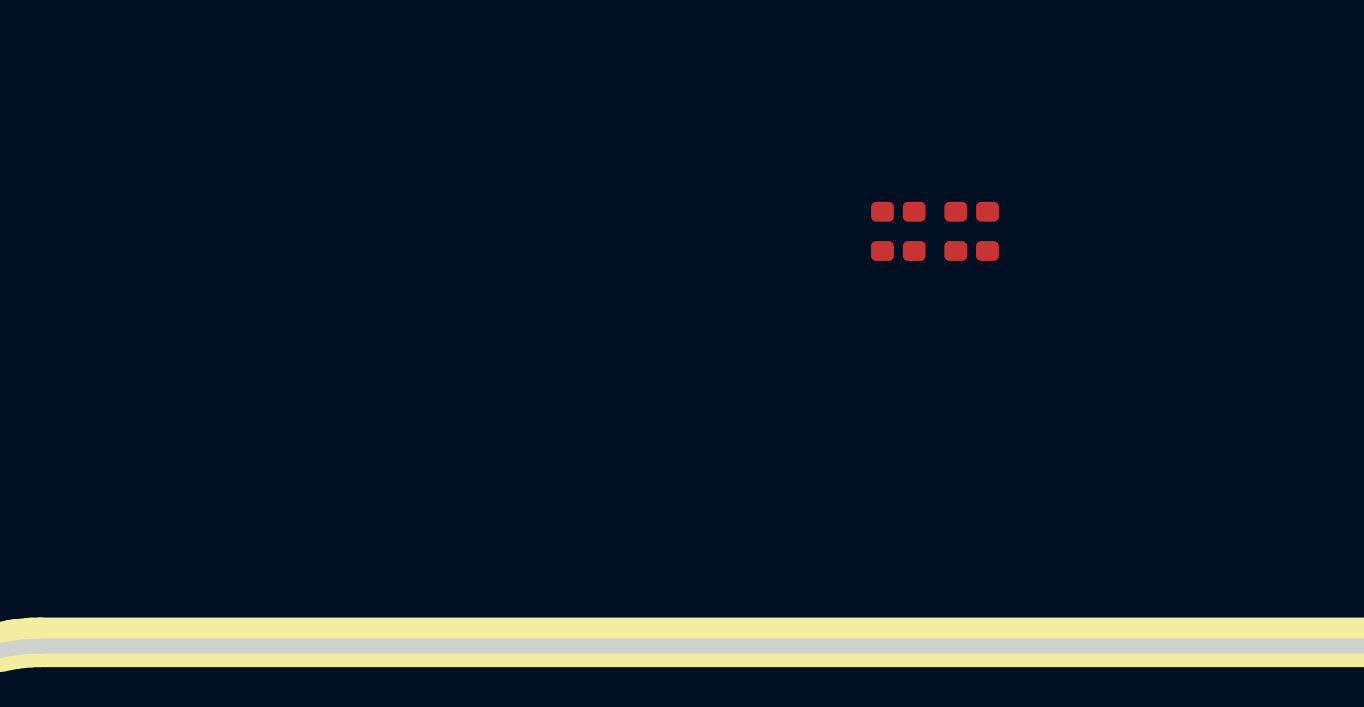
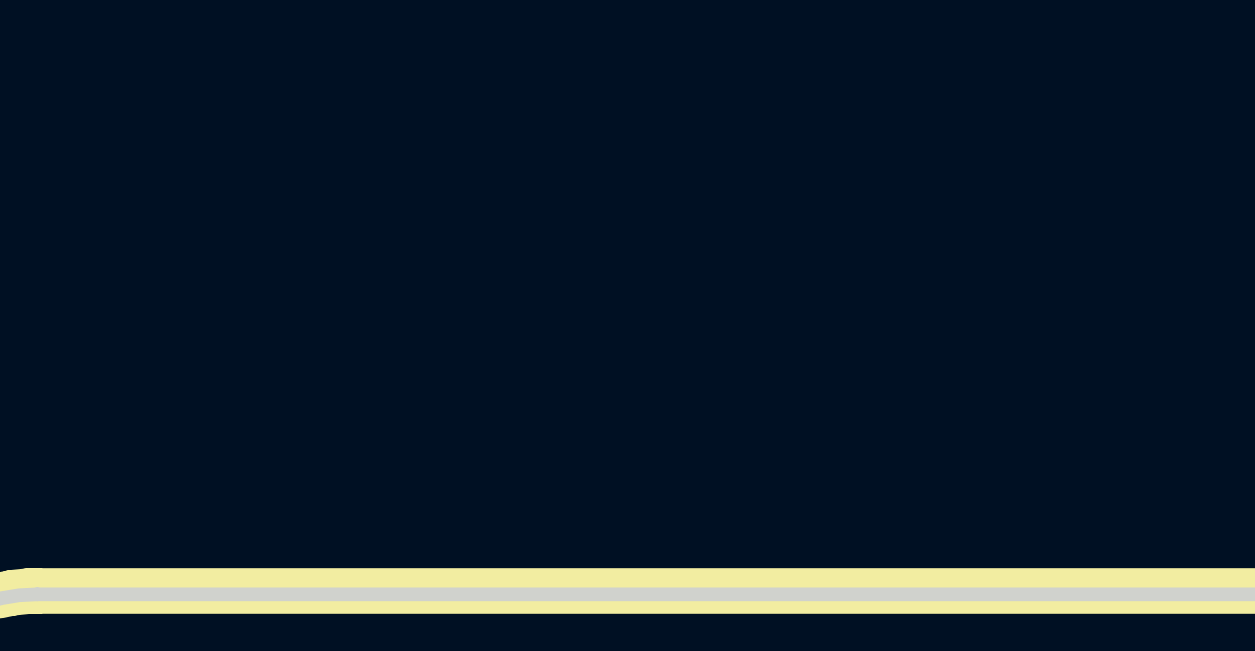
part: (898, 211) -> none
part: (971, 211) -> none
part: (898, 250) -> none
part: (971, 250) -> none

